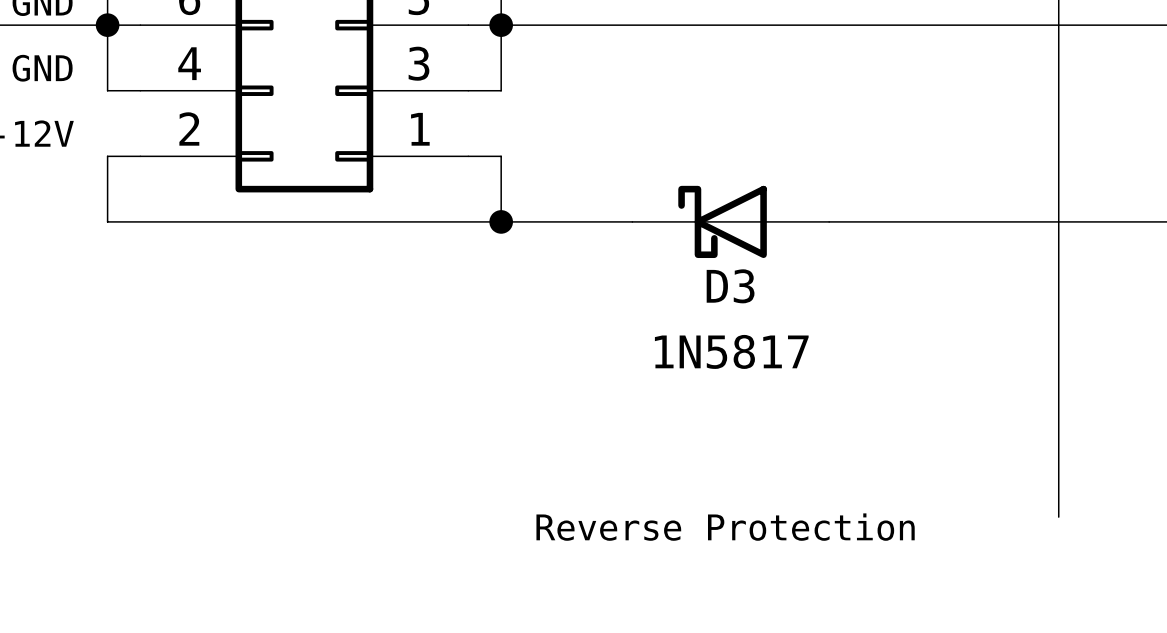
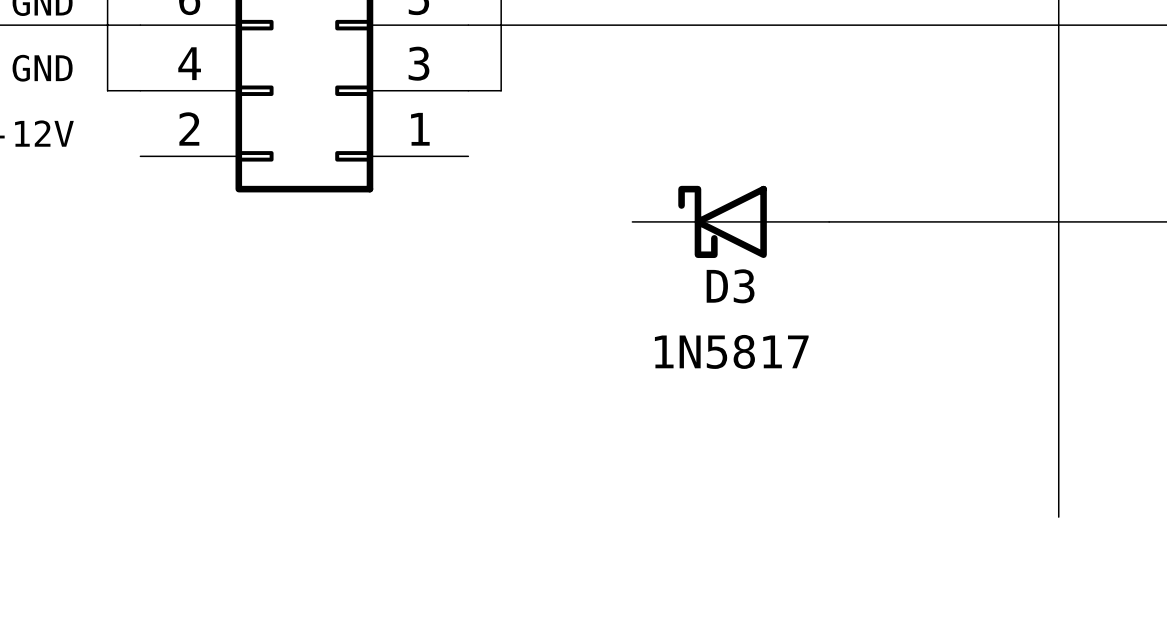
junction: (107, 25) -> none
junction: (501, 25) -> none
wire: (140, 156) (107, 156) (107, 221) (632, 221) -> none
wire: (468, 156) (501, 156) (501, 221) -> none
junction: (501, 221) -> none
text: Reverse Protection (725, 527) -> none

